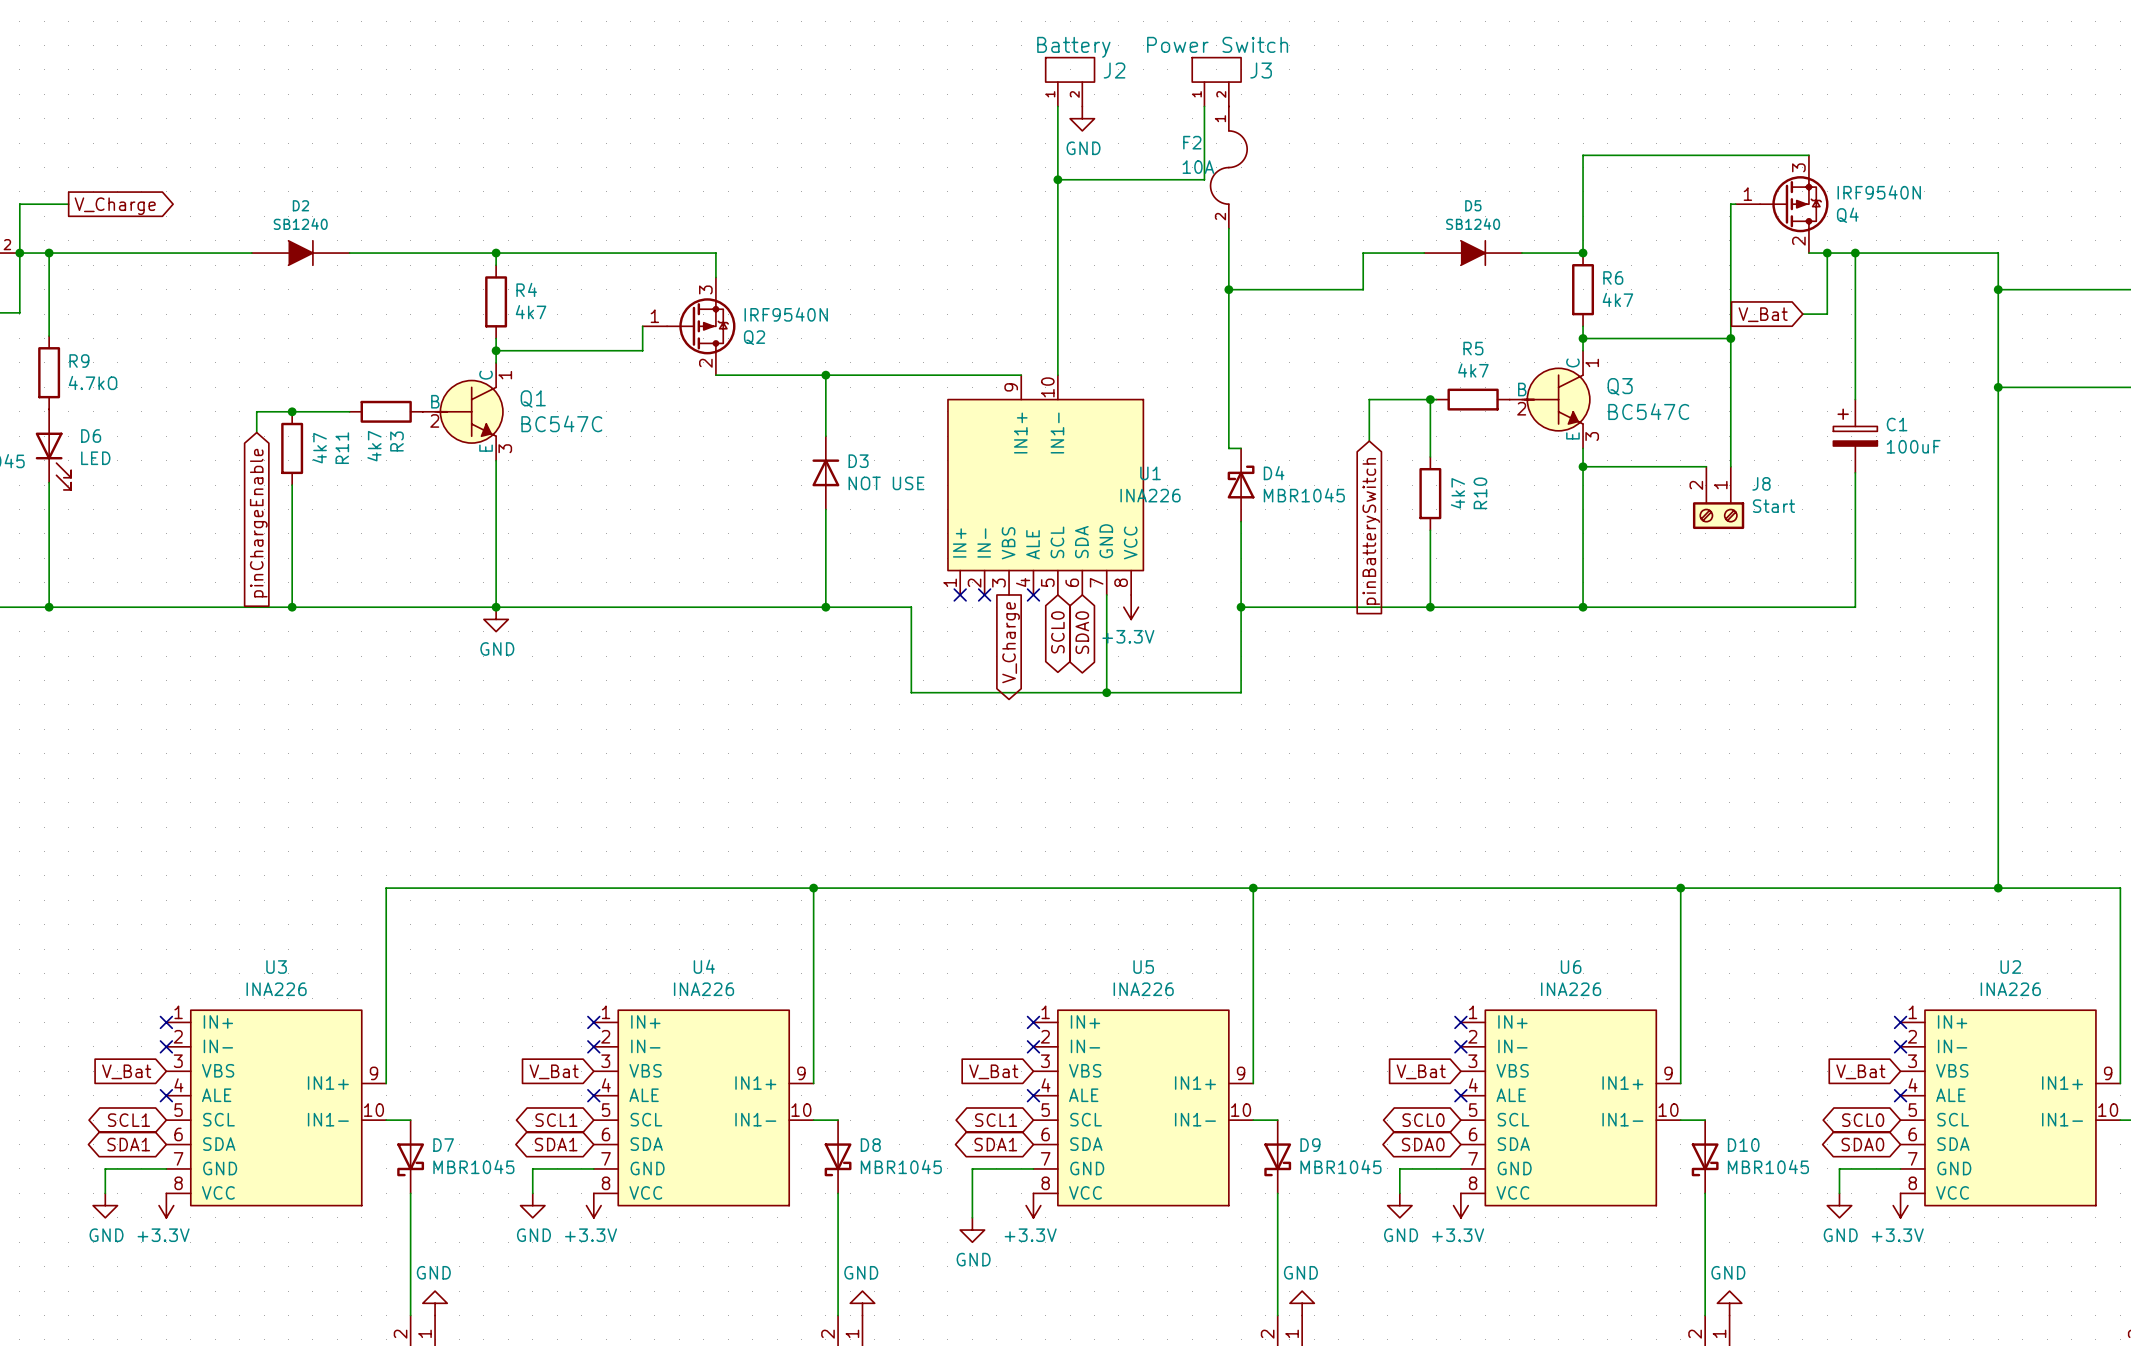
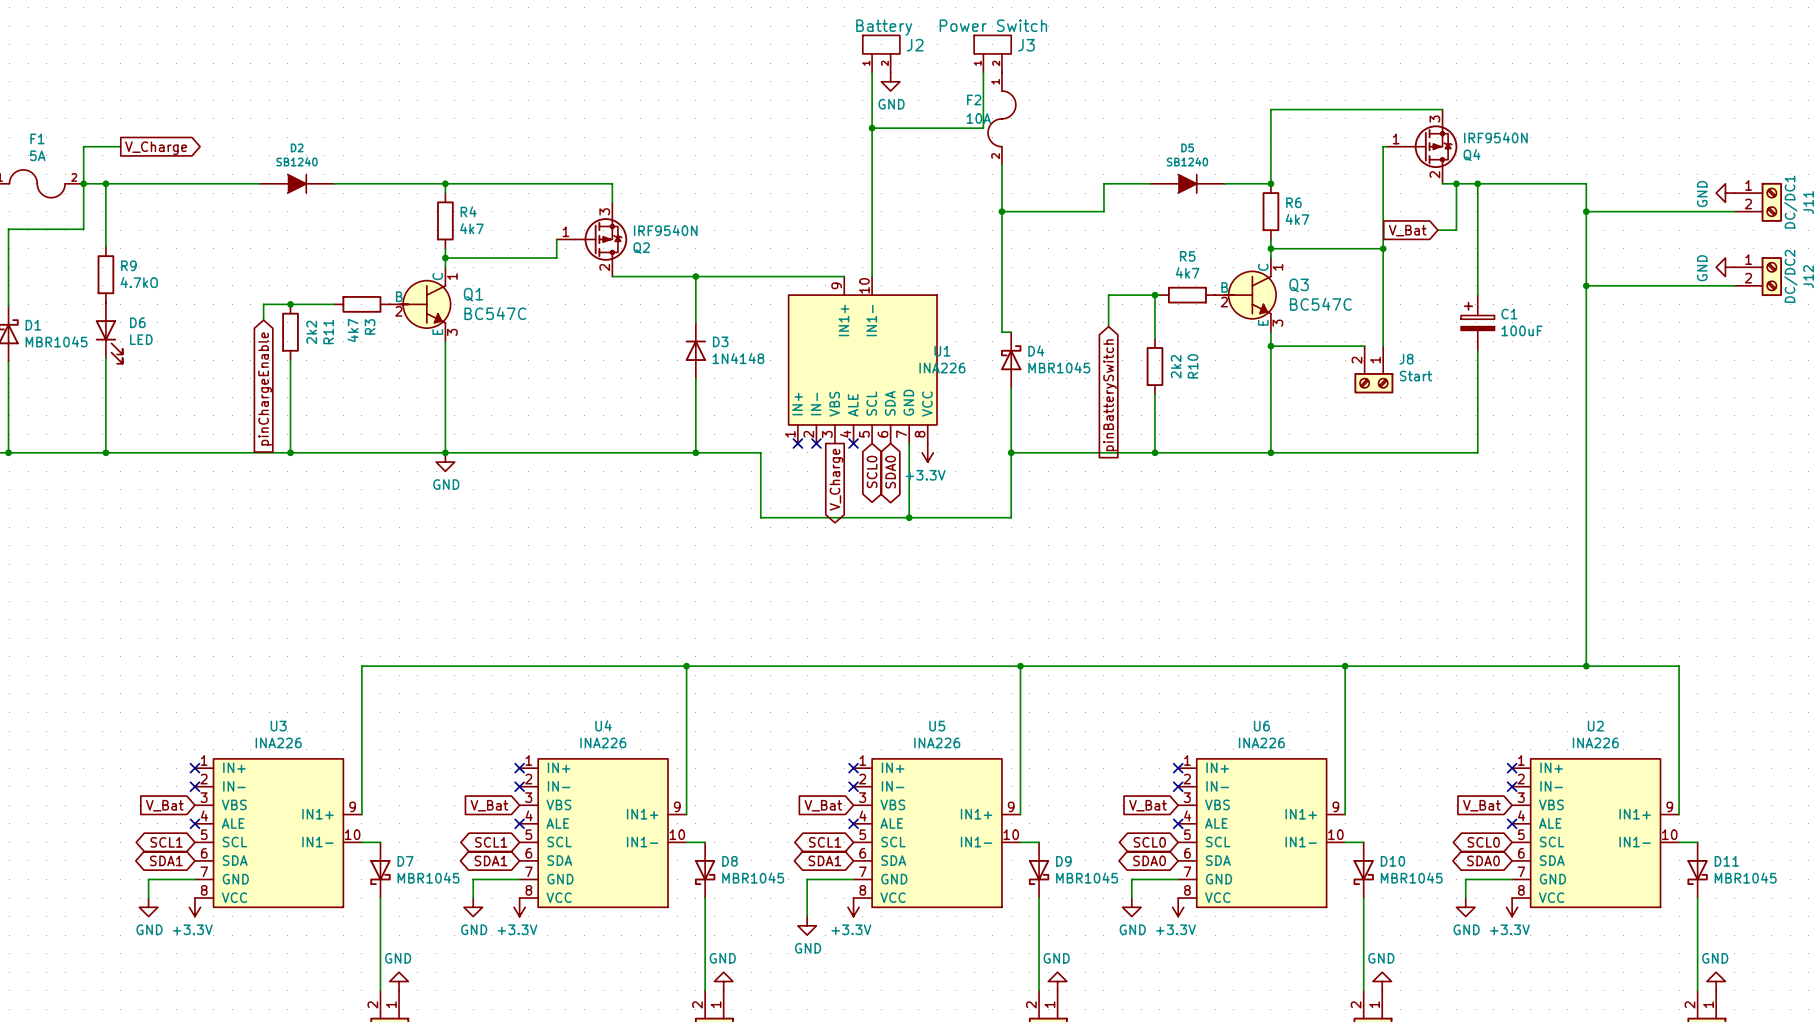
R11 value: 4k7 (319, 448) -> 2k2 (311, 332)
D3 value: NOT USE (886, 483) -> 1N4148 (738, 358)
R10 value: 4k7 (1457, 493) -> 2k2 (1176, 366)

